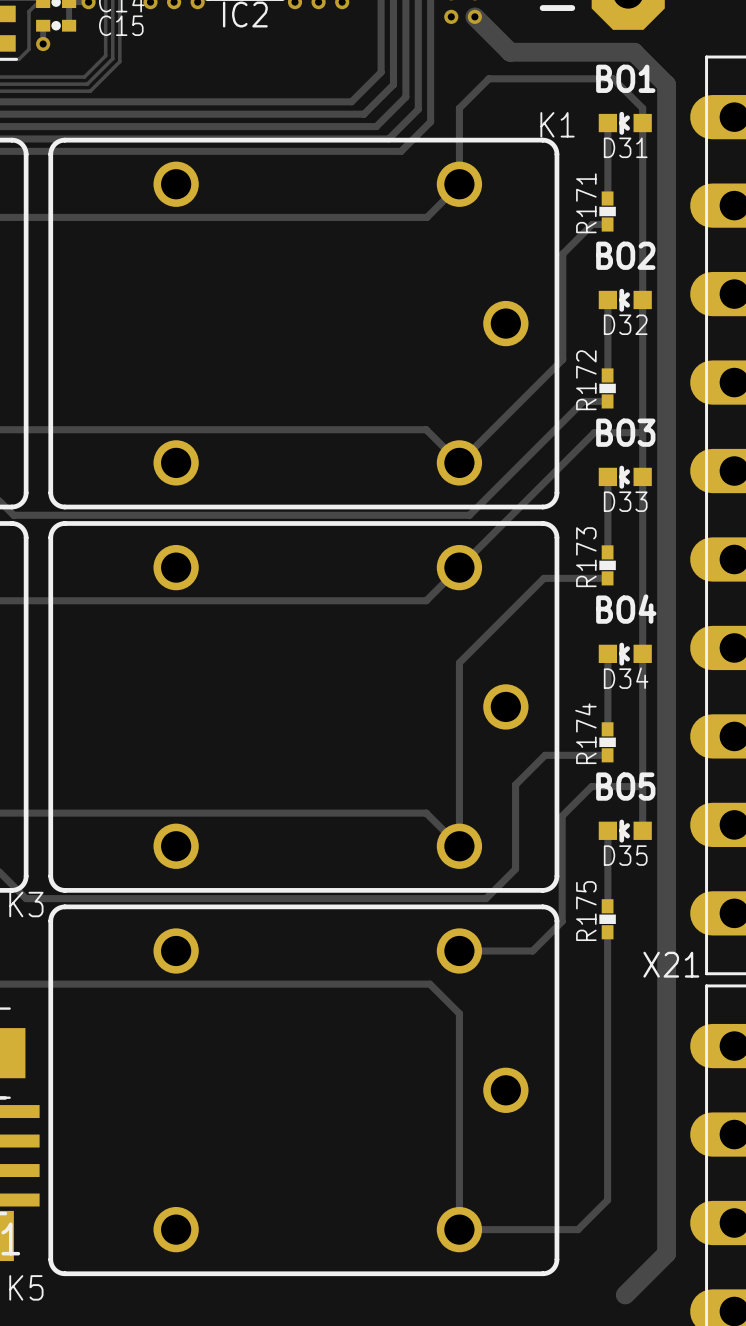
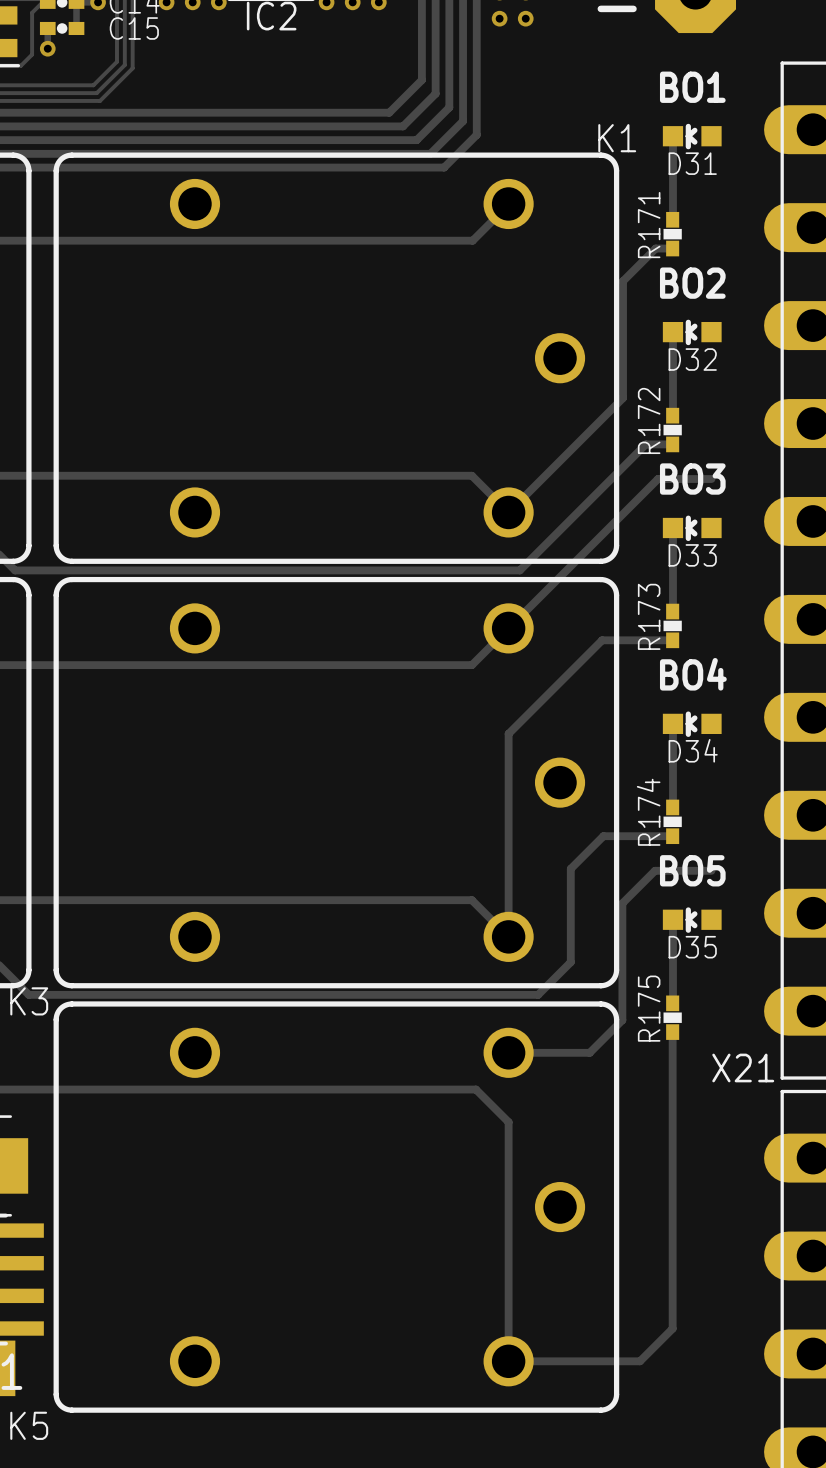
track: (474, 16) (510, 52) (634, 52) (666, 84) (666, 1253) (625, 1294) -> none
track: (459, 184) (459, 108) (488, 78) (613, 78) (642, 108) (642, 830) -> none

